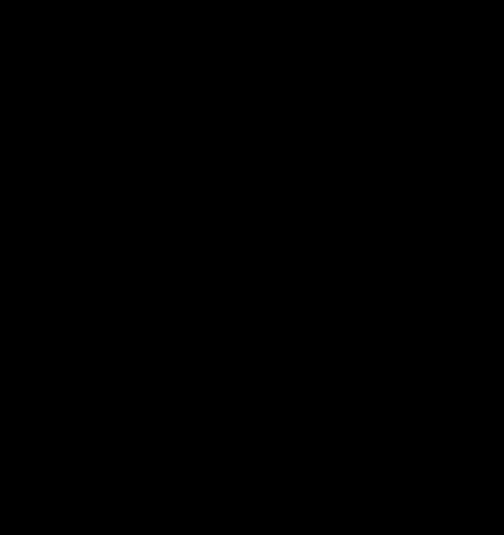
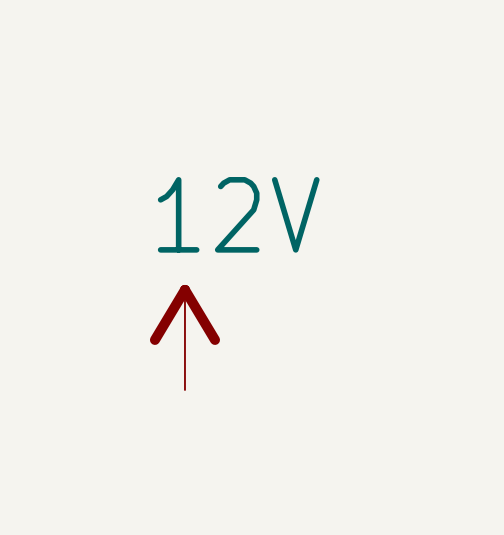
power symbol: none -> 12V (184, 337)

